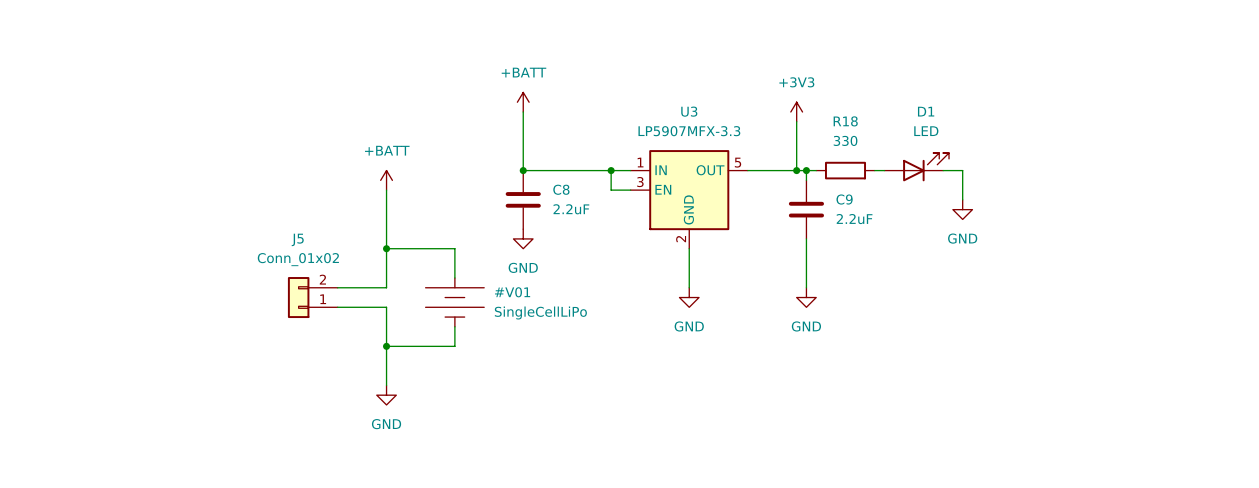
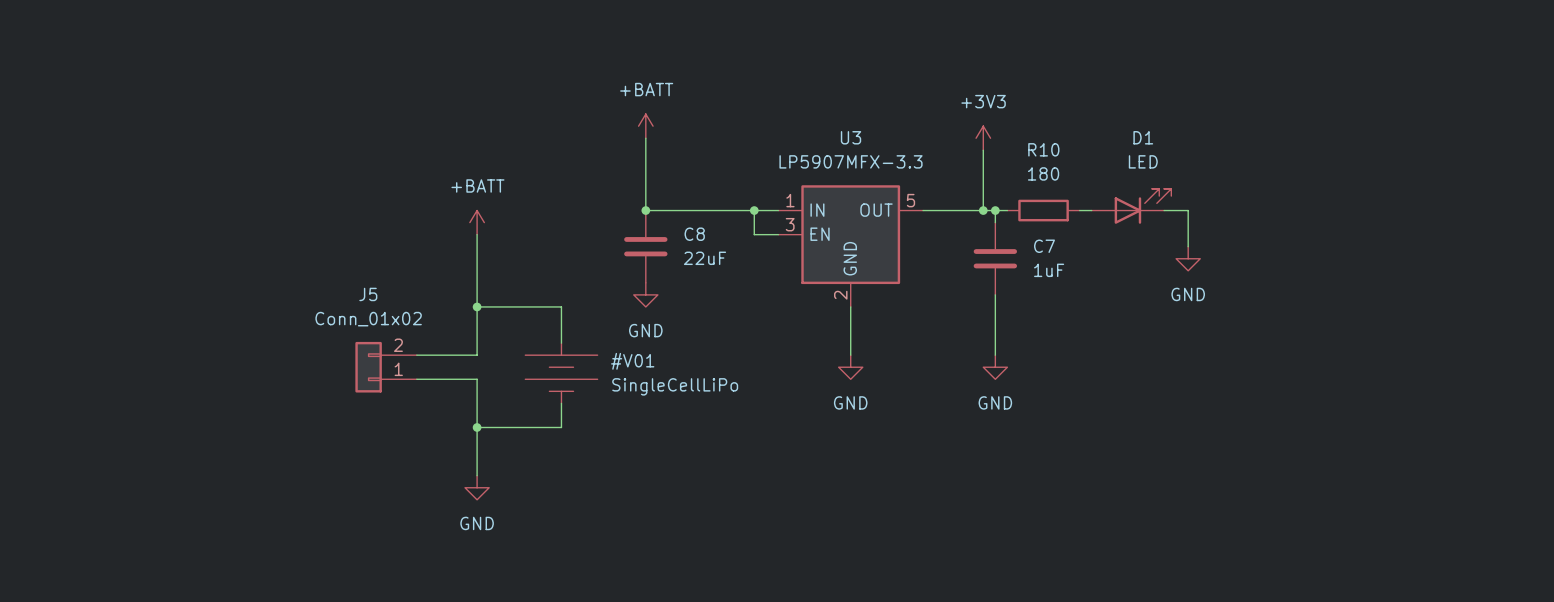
R18 name: R18 (845, 121) -> R10 (1043, 149)
R18 value: 330 (845, 140) -> 180 (1043, 173)
C9 name: C9 (844, 199) -> C7 (1044, 246)
C8 value: 2.2uF (571, 209) -> 22uF (705, 258)
C9 value: 2.2uF (854, 219) -> 1uF (1049, 270)

